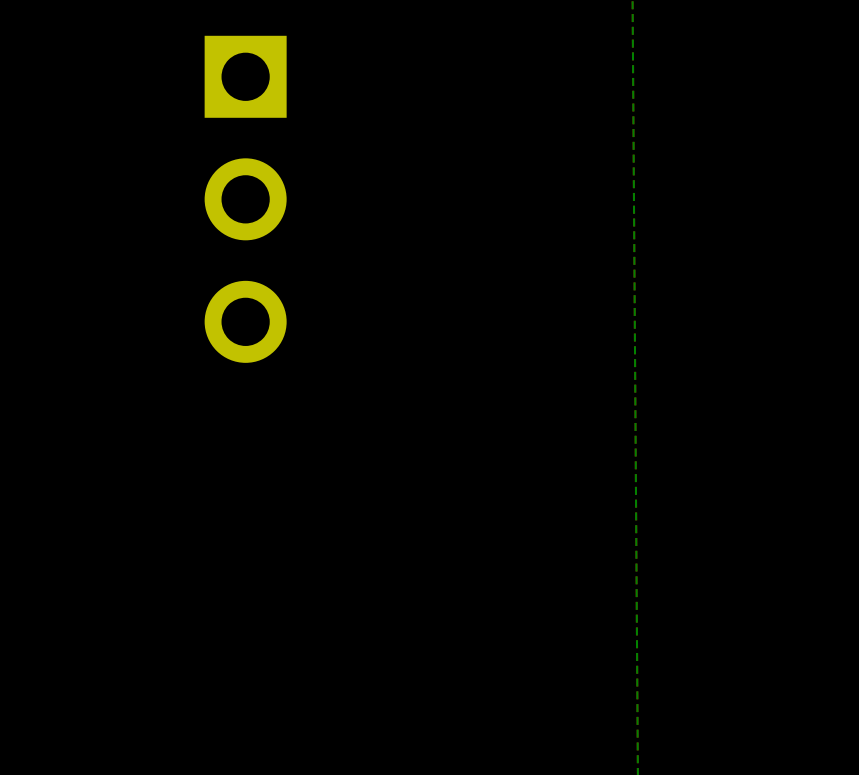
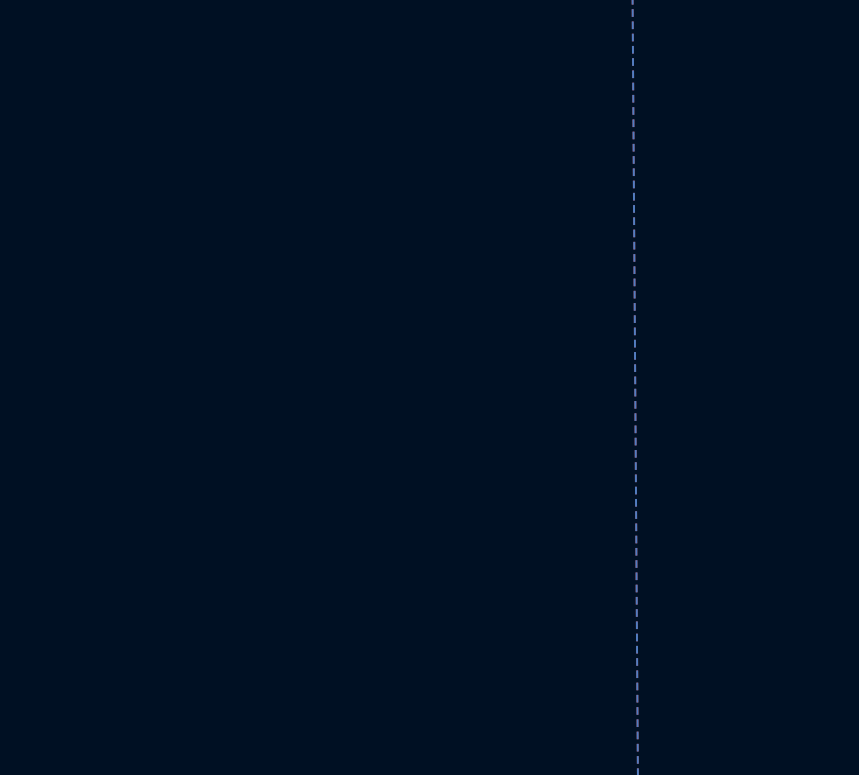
part: (245, 199) -> none

